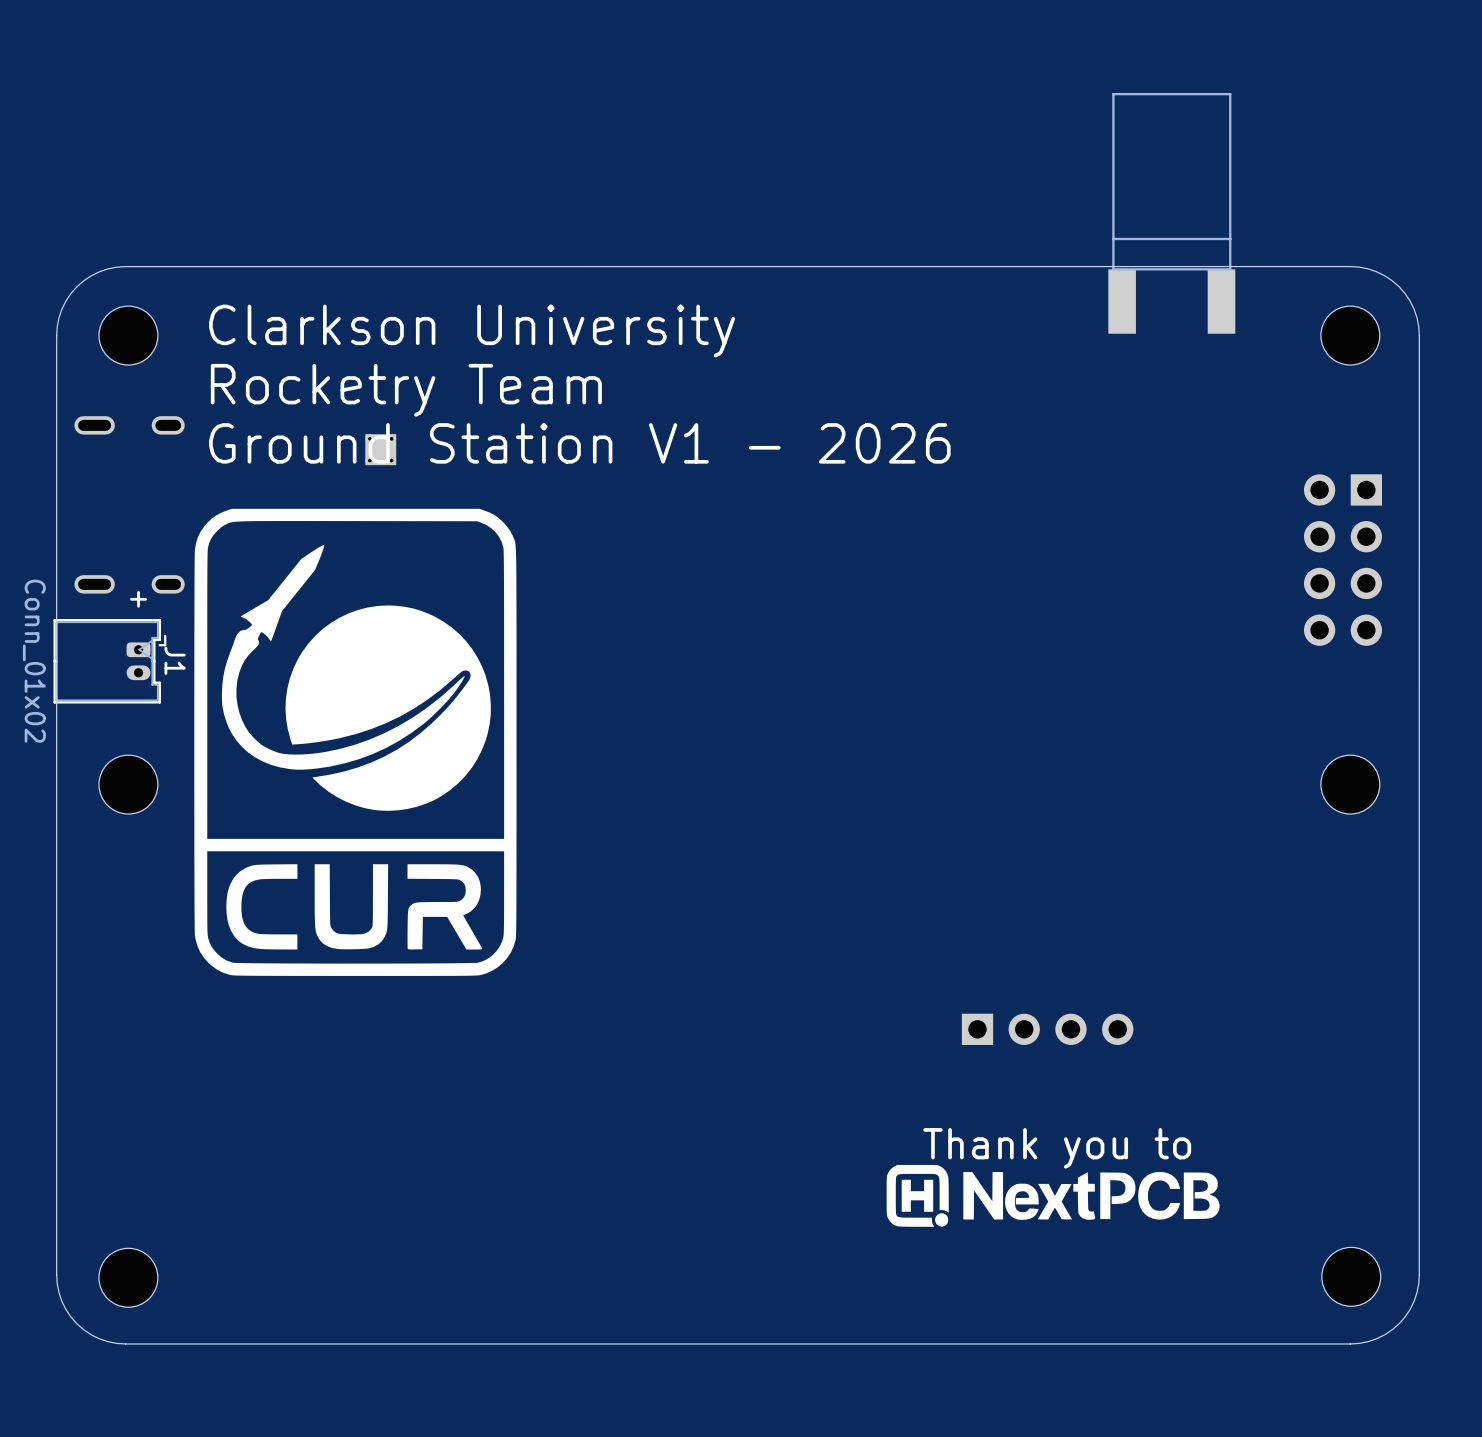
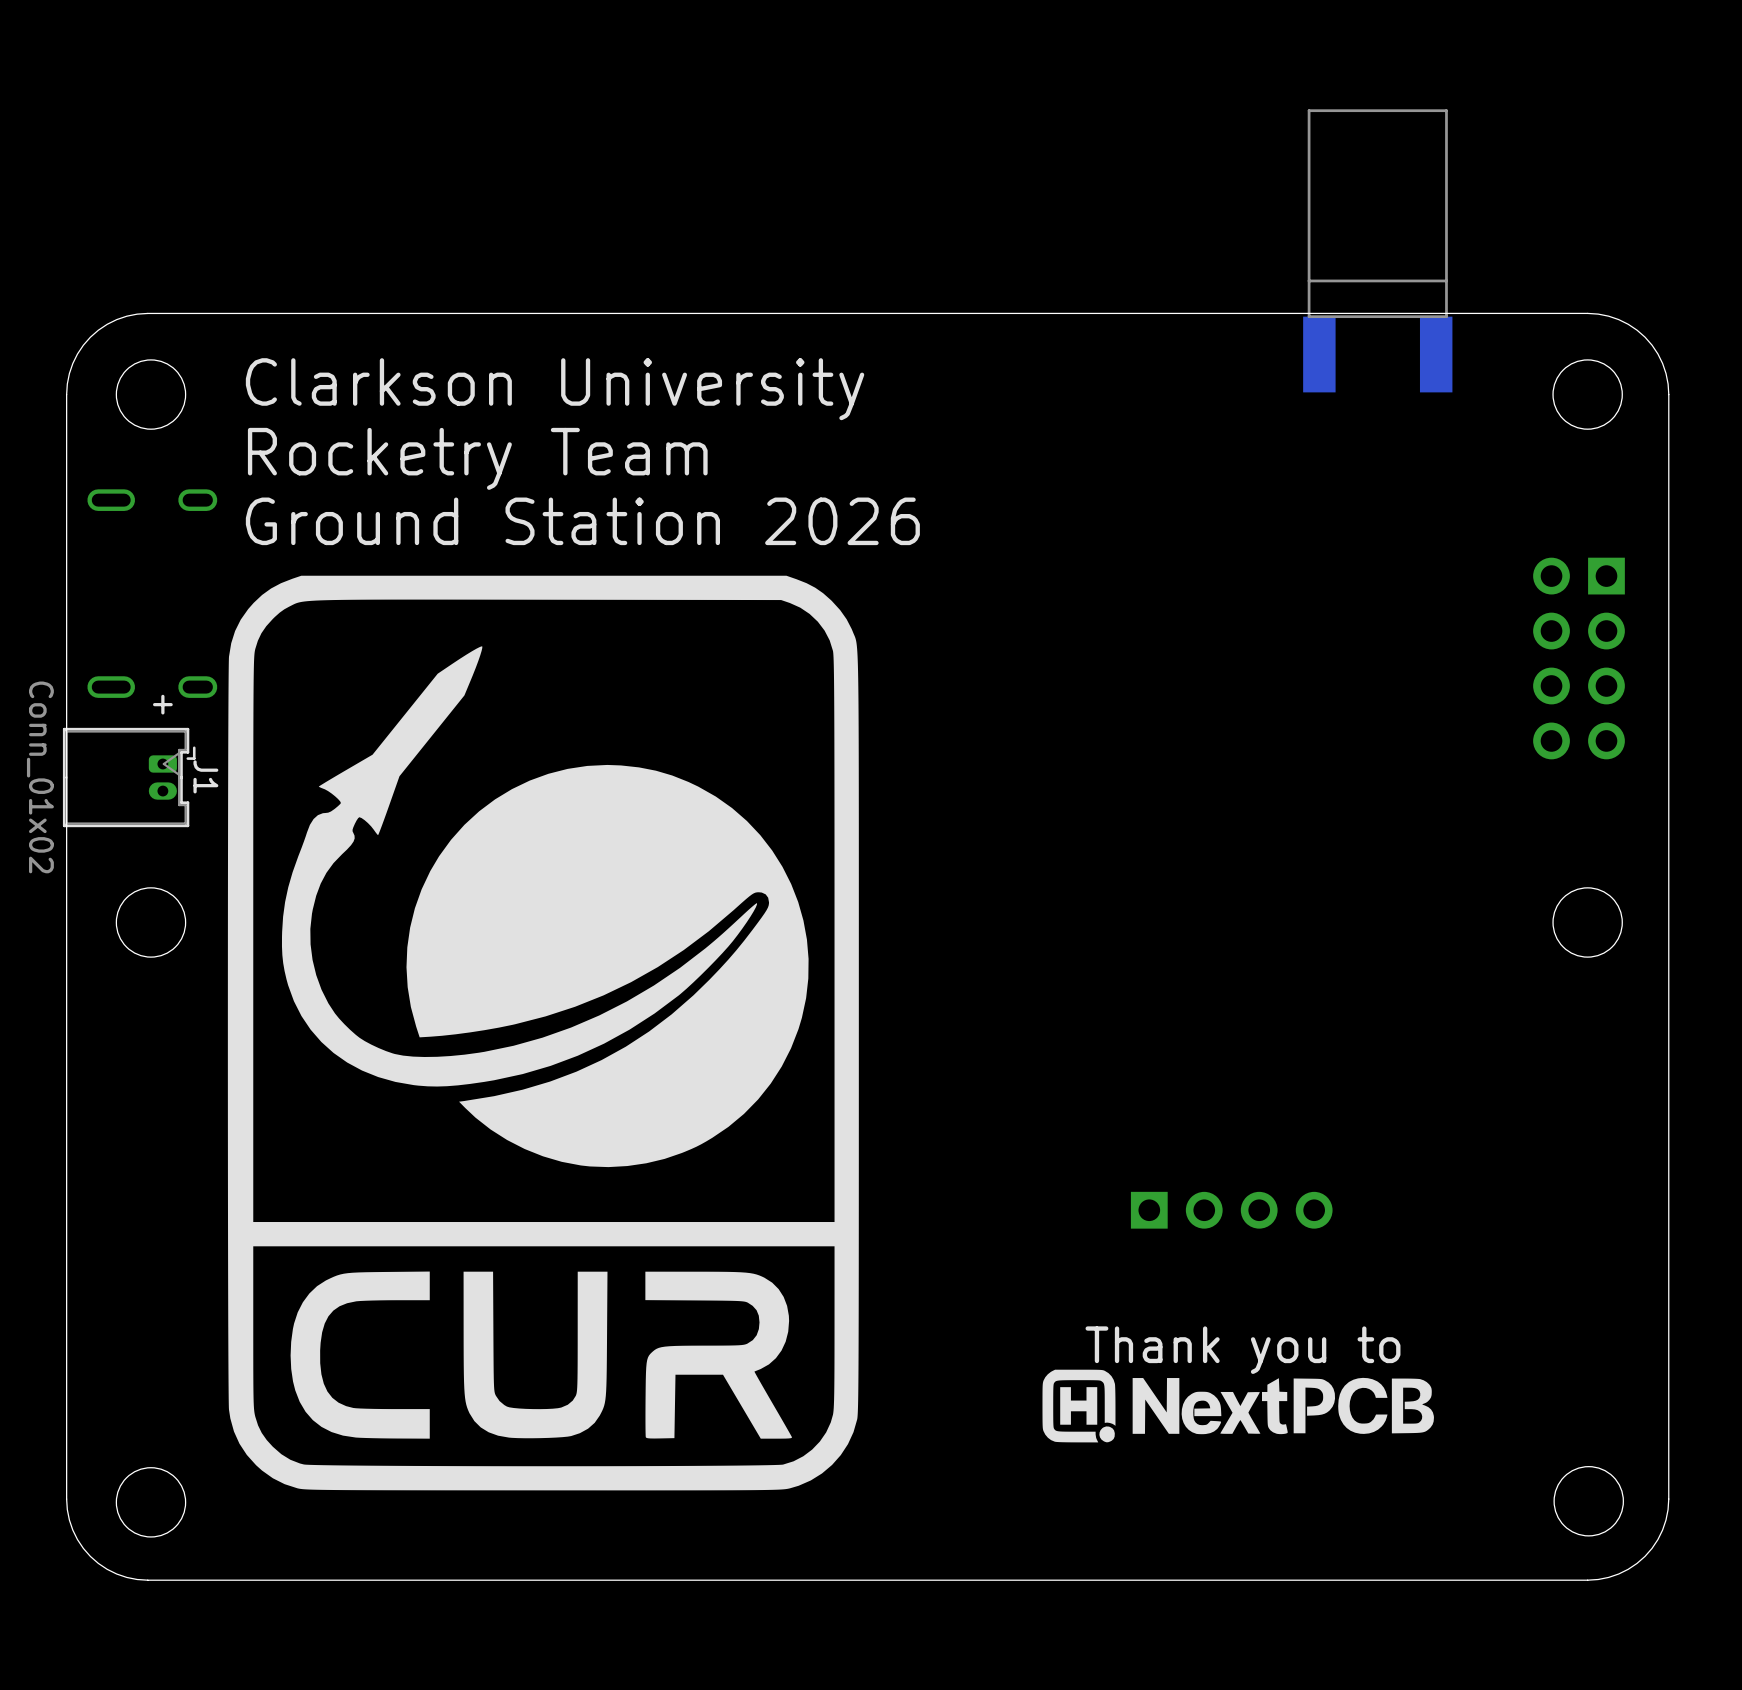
text: Ground Station V1 - 2026 (579, 443) -> Ground Station 2026 (582, 521)
part: (380, 449) -> none
drawing: none -> [227, 575, 859, 1491]
drawing: [194, 508, 517, 976] -> none

